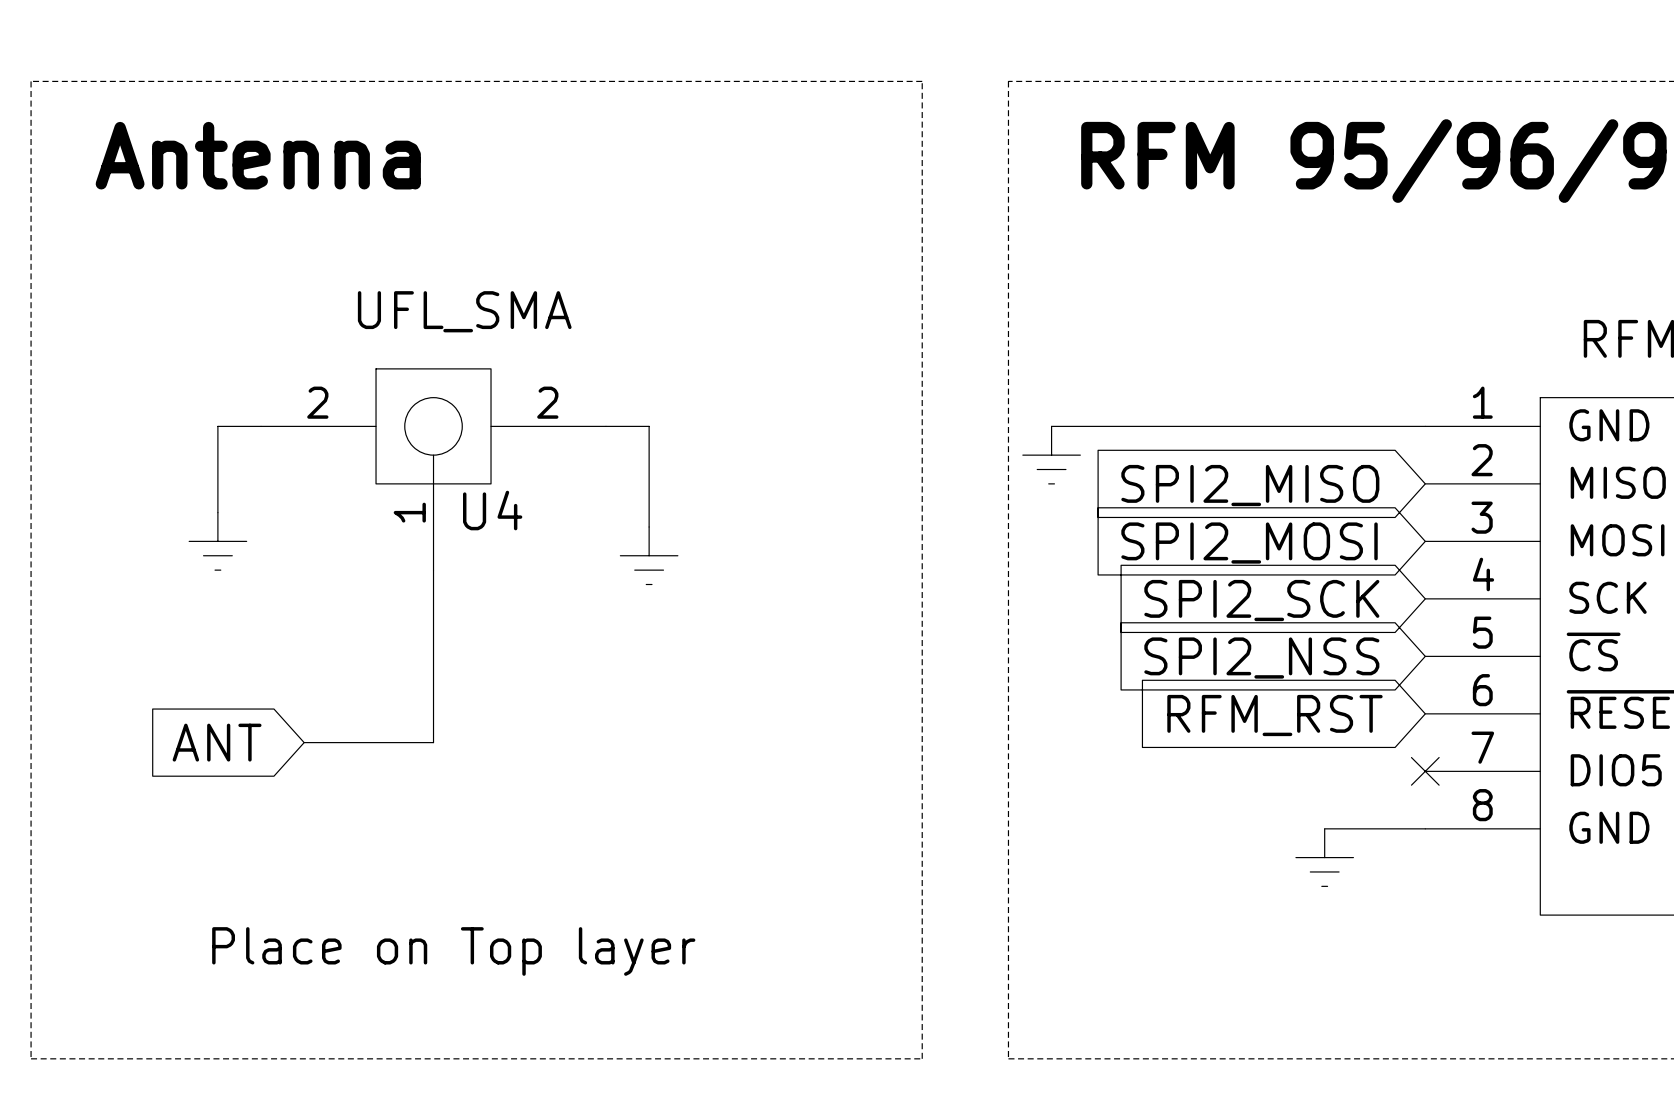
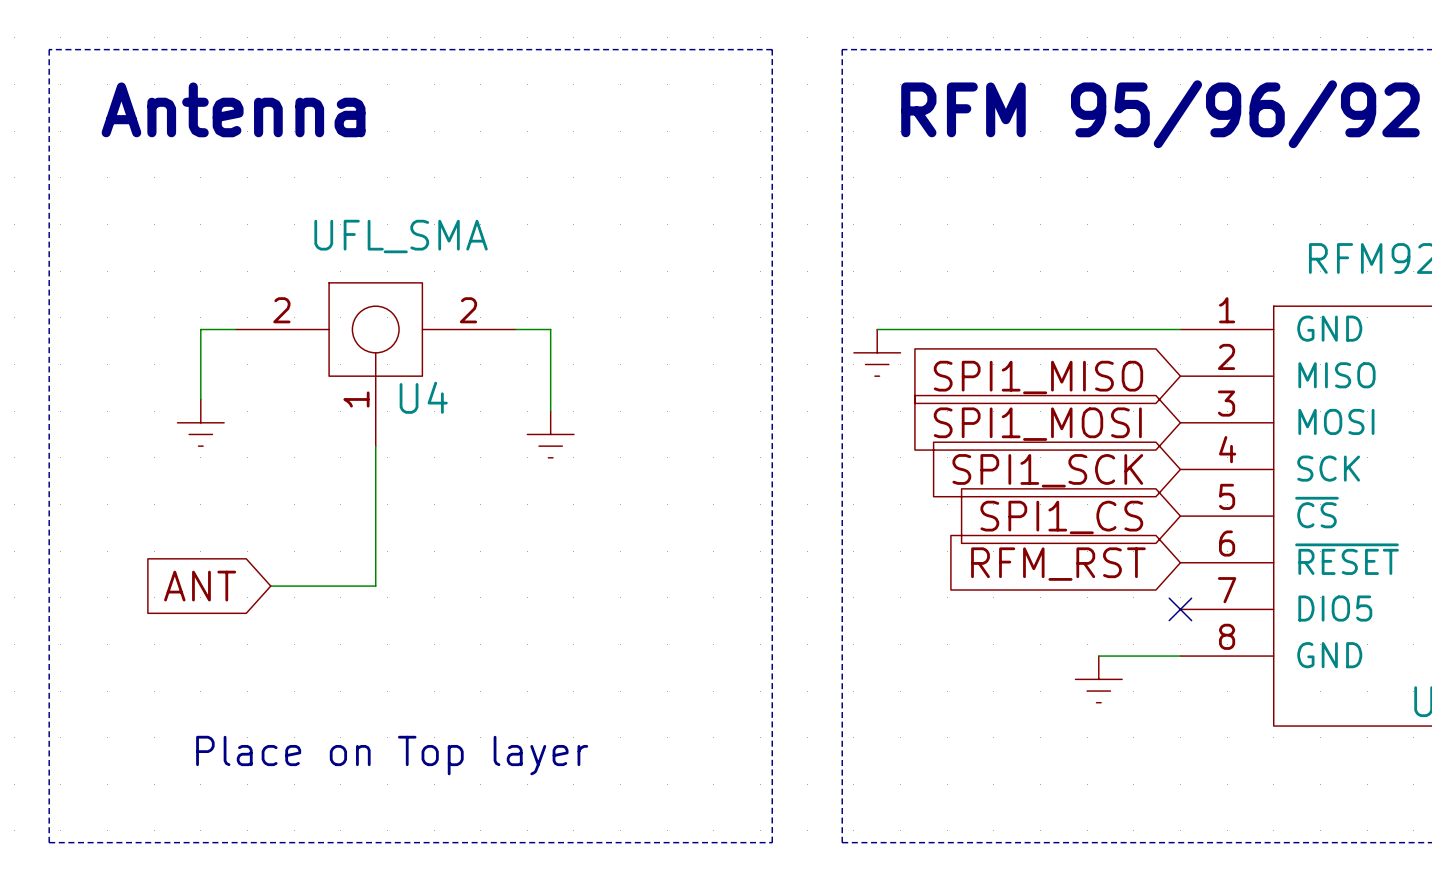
global label: SPI2_MISO (1250, 485) -> SPI1_MISO (1038, 377)
global label: SPI2_MOSI (1249, 543) -> SPI1_MOSI (1037, 424)
global label: SPI2_SCK (1261, 600) -> SPI1_SCK (1047, 470)
global label: SPI2_NSS (1261, 658) -> SPI1_CS (1061, 517)

